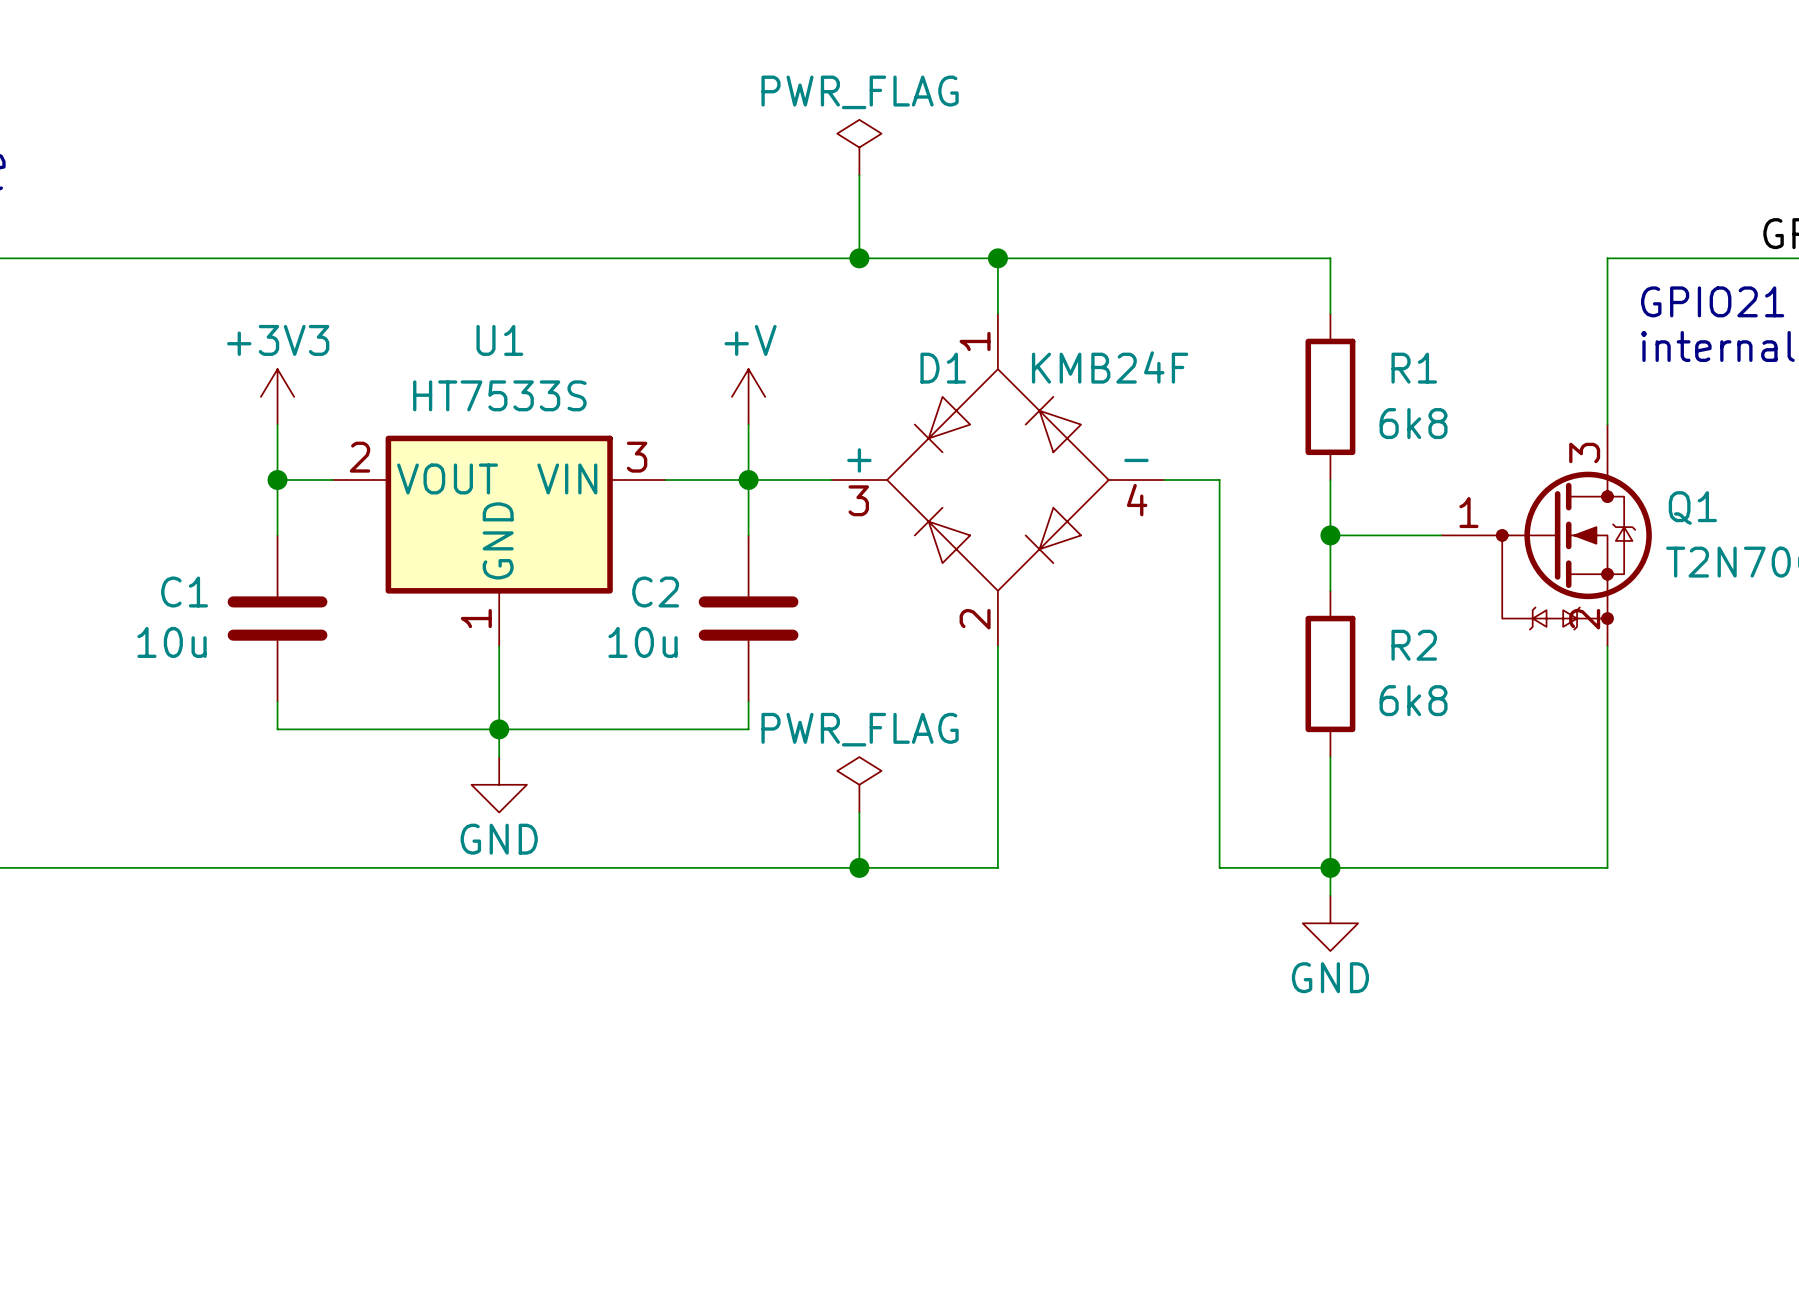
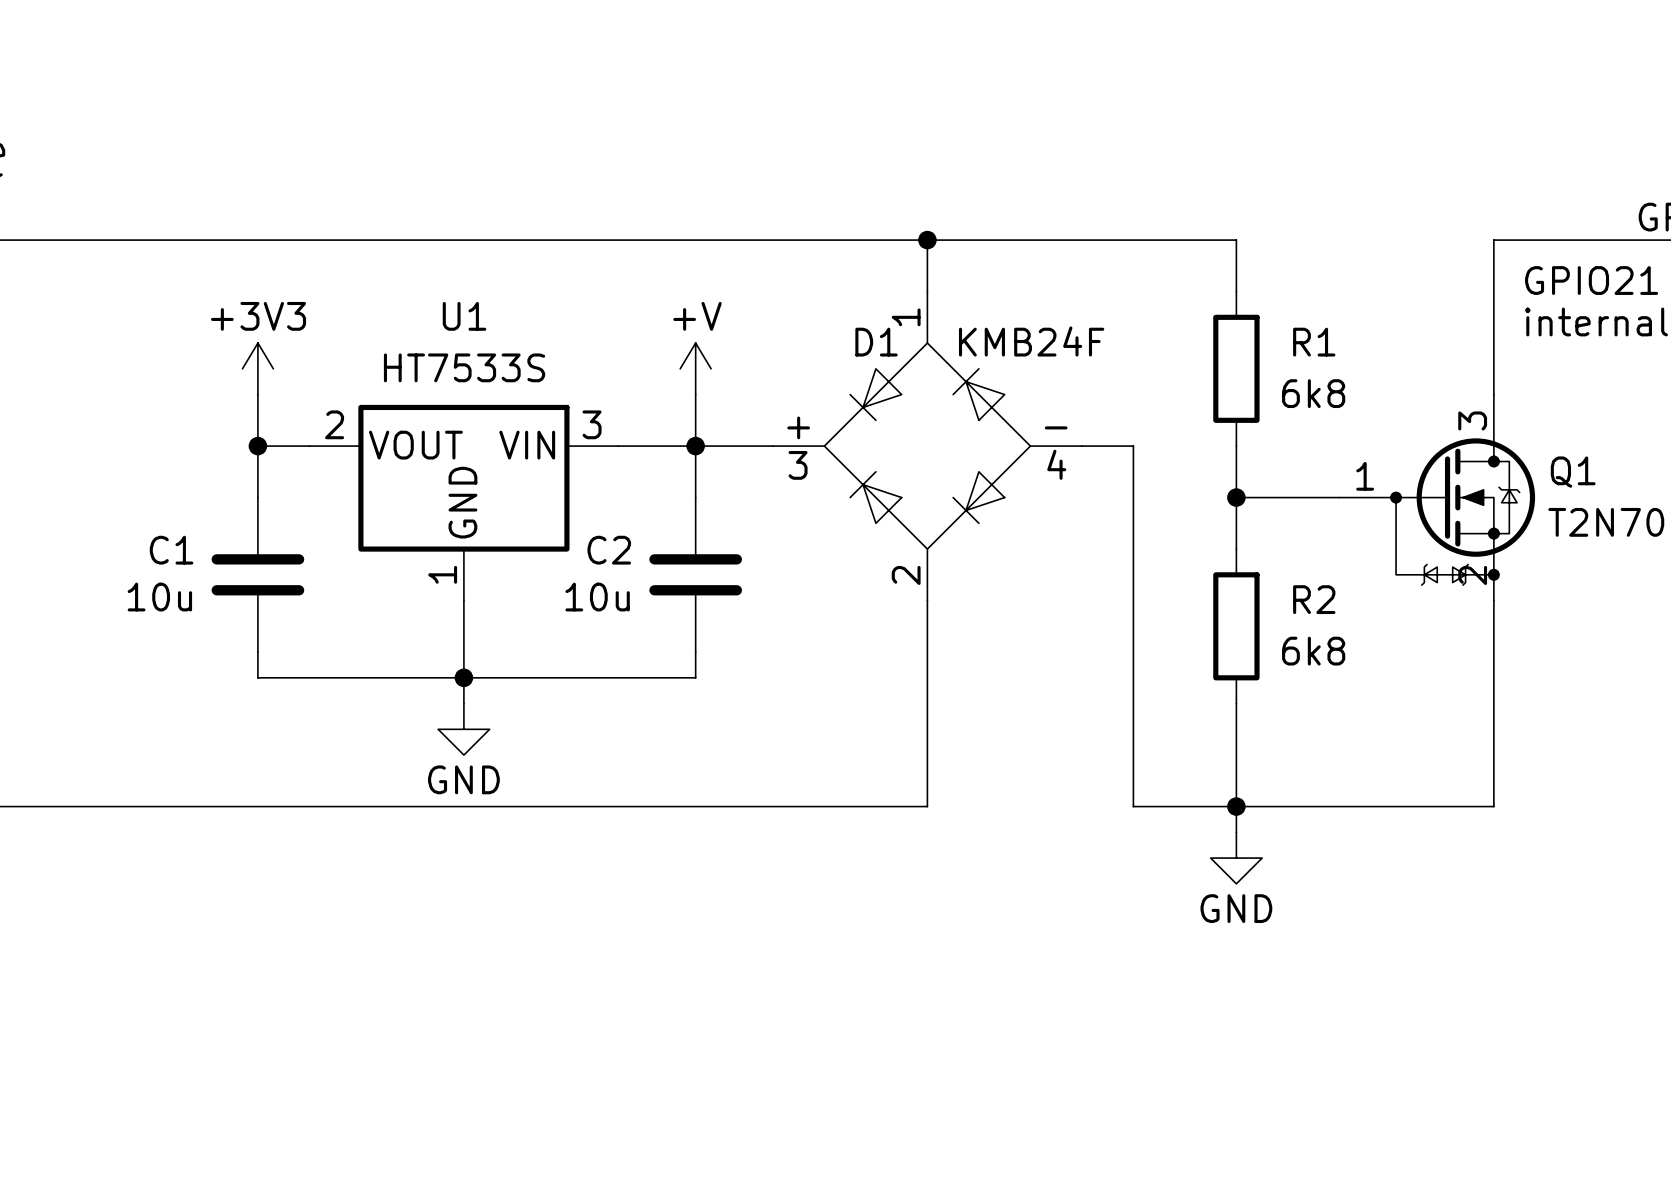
power symbol: PWR_FLAG (859, 147) -> none
wire: (859, 175) (859, 258) -> none
junction: (859, 258) -> none
power symbol: PWR_FLAG (859, 784) -> none
wire: (859, 812) (859, 867) -> none
junction: (859, 867) -> none

